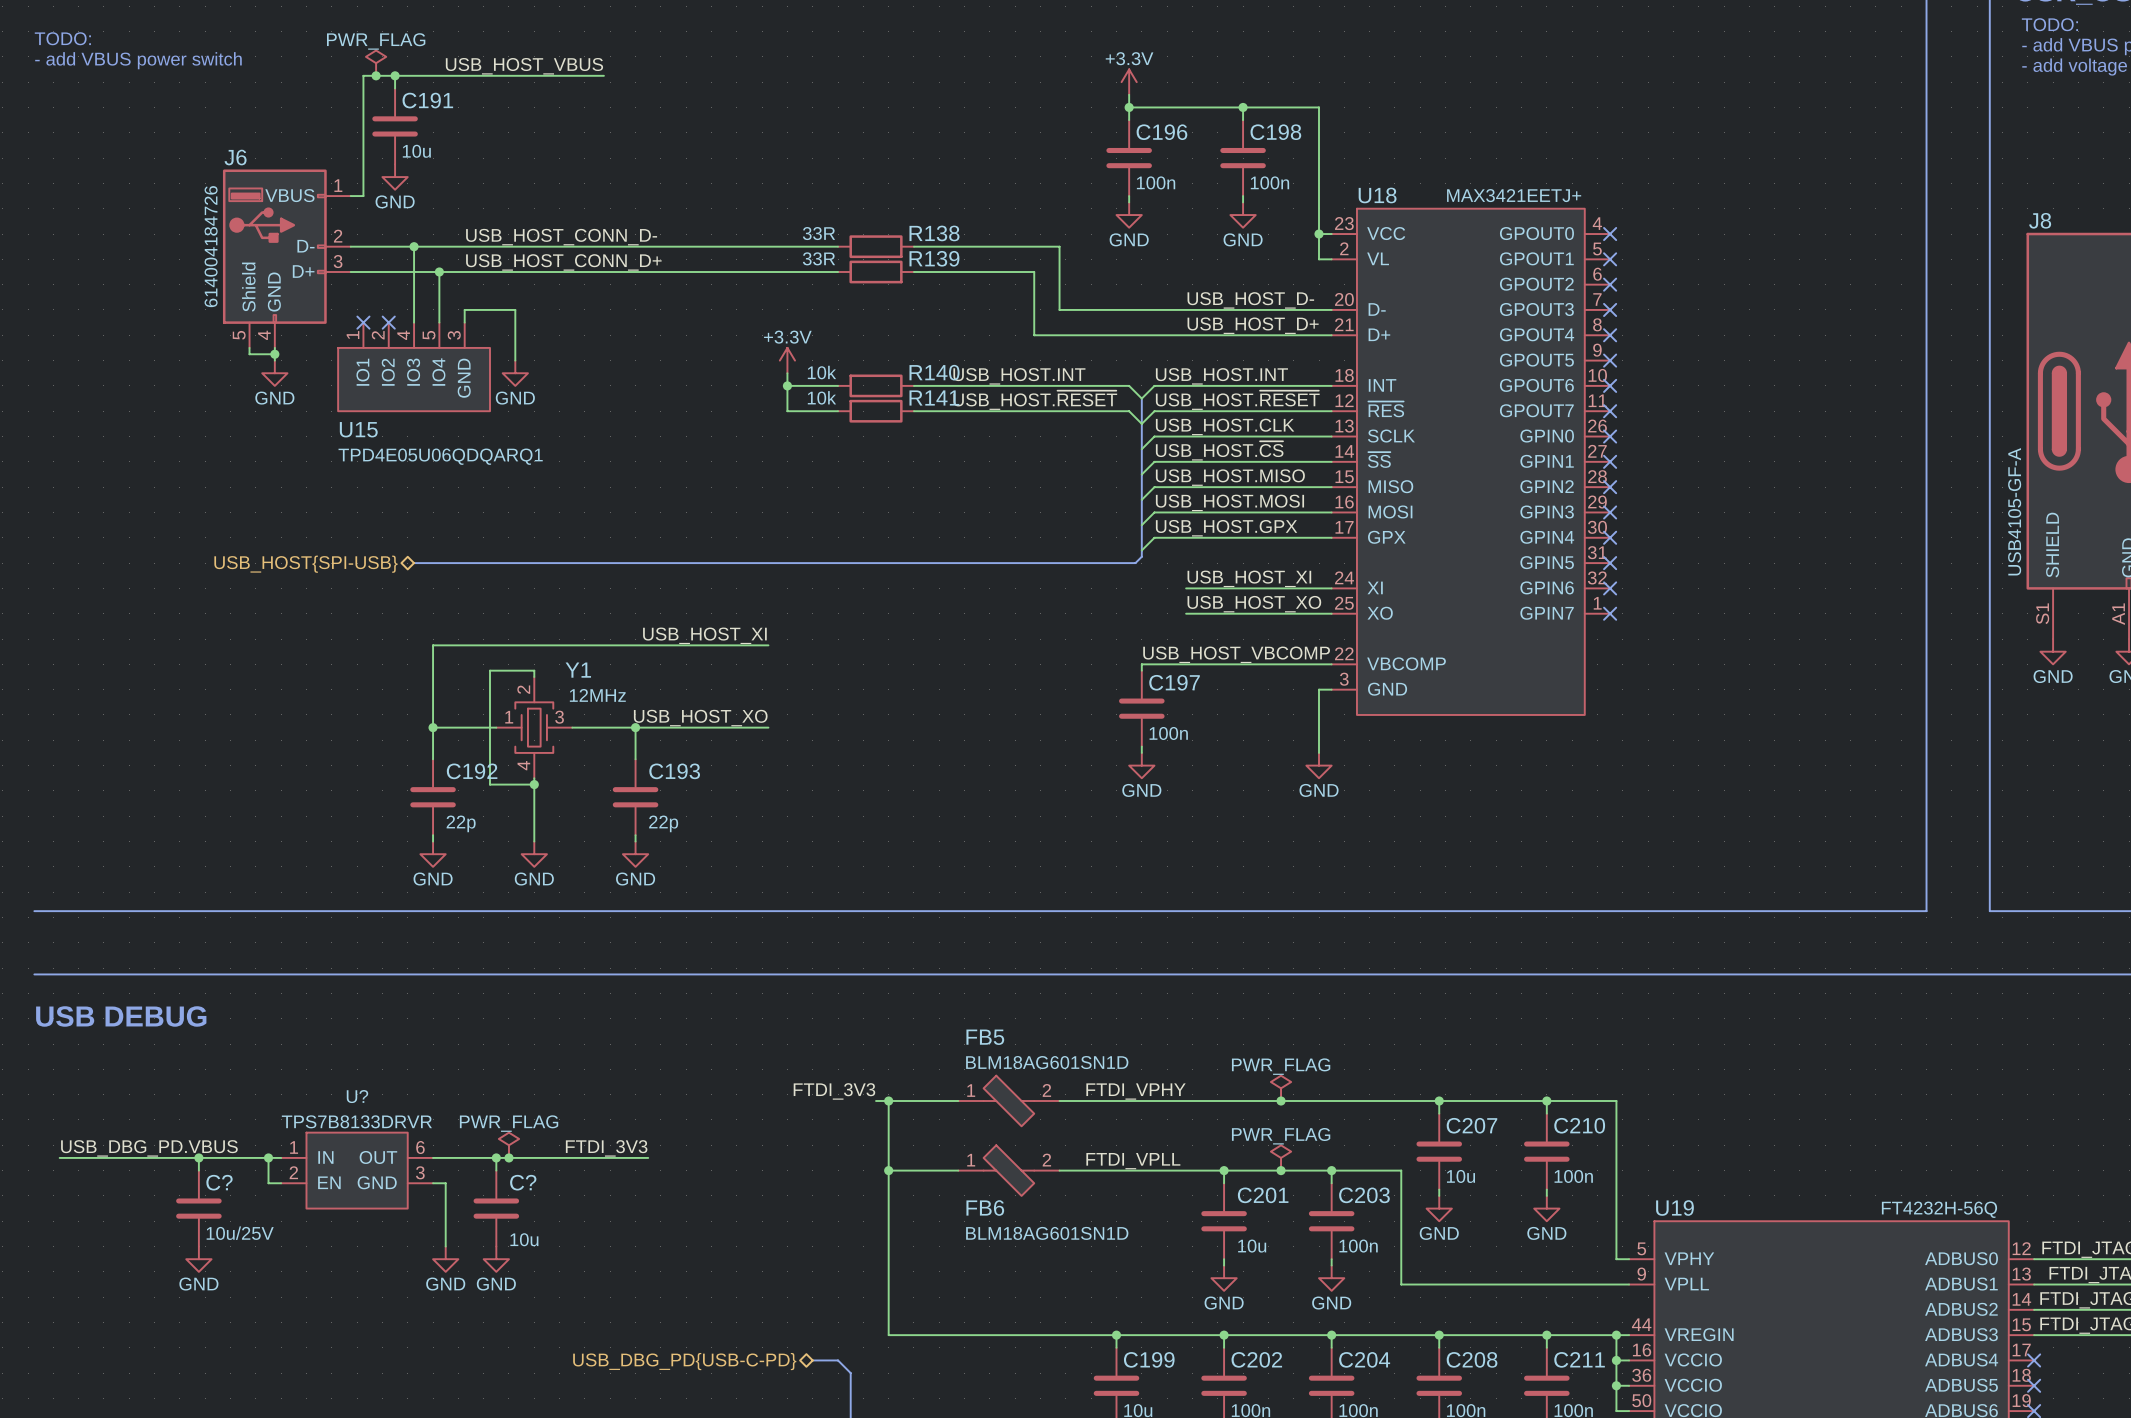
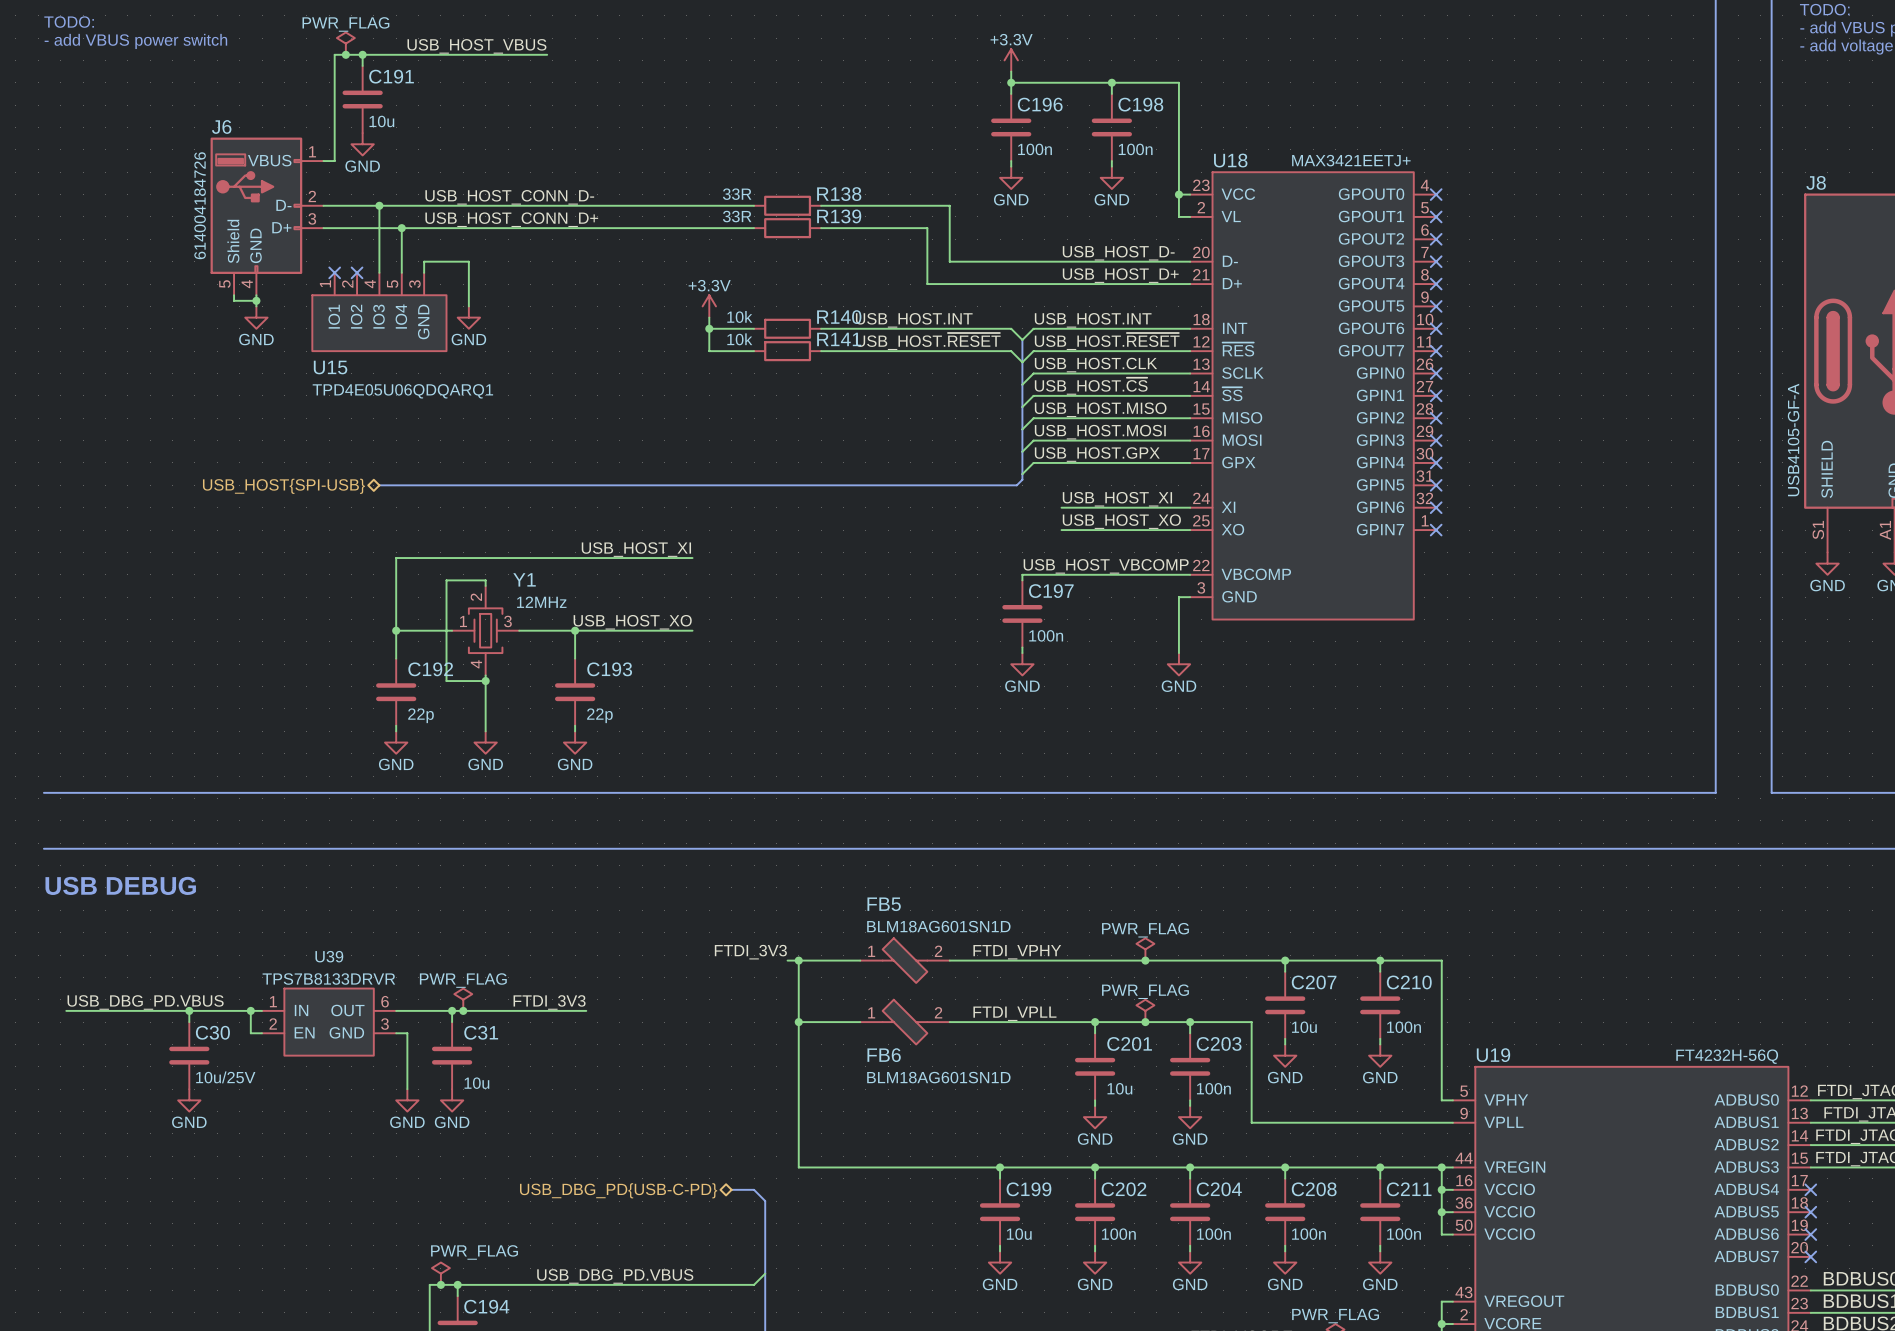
U? name: U? (357, 1096) -> U39 (329, 956)
C? name: C? (219, 1182) -> C30 (212, 1032)
C? name: C? (523, 1182) -> C31 (481, 1032)

